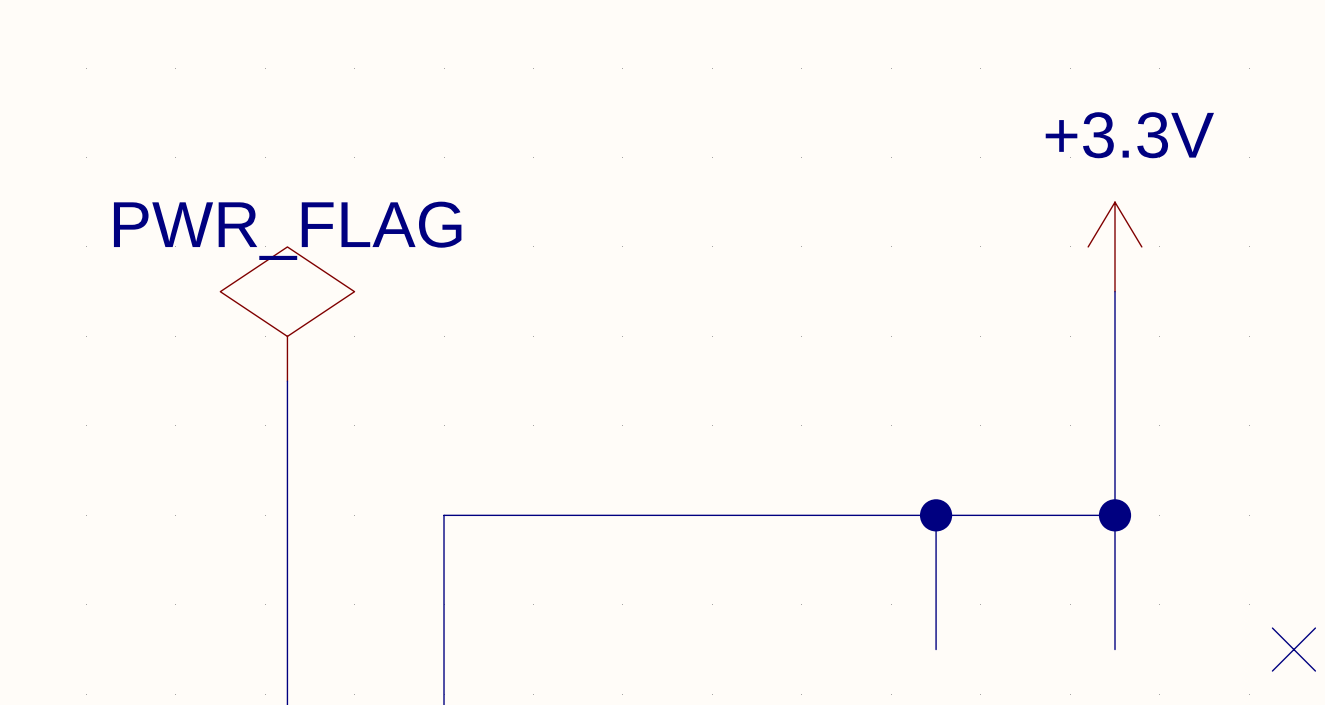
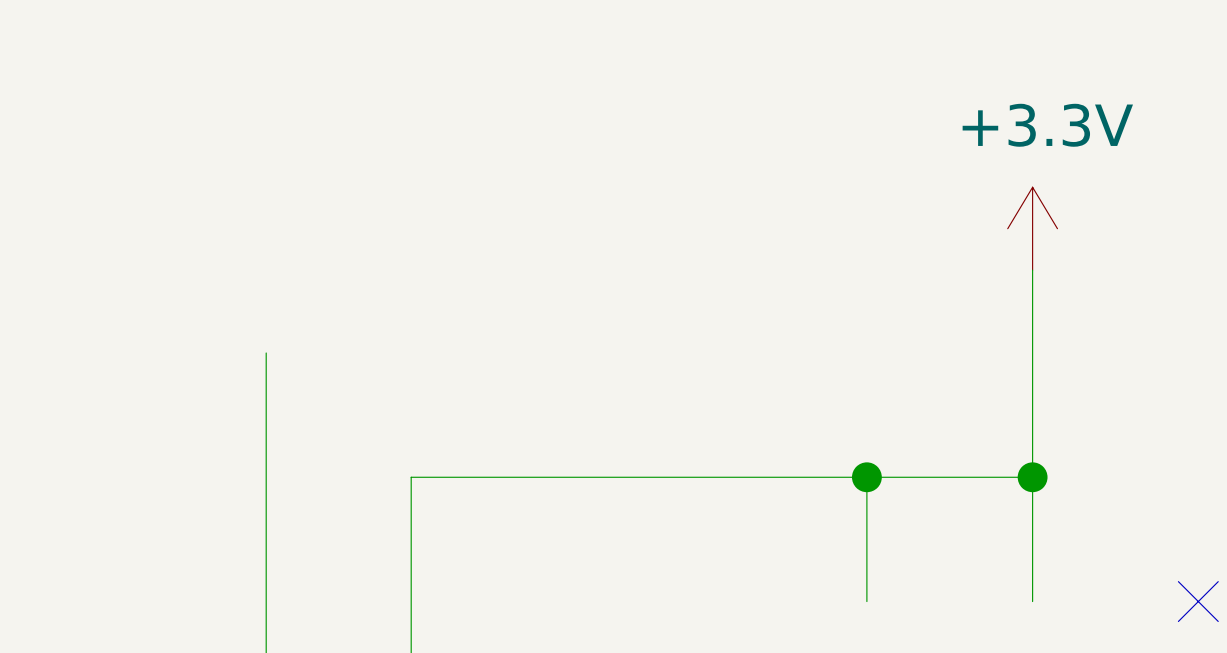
power symbol: PWR_FLAG (287, 314) -> none

